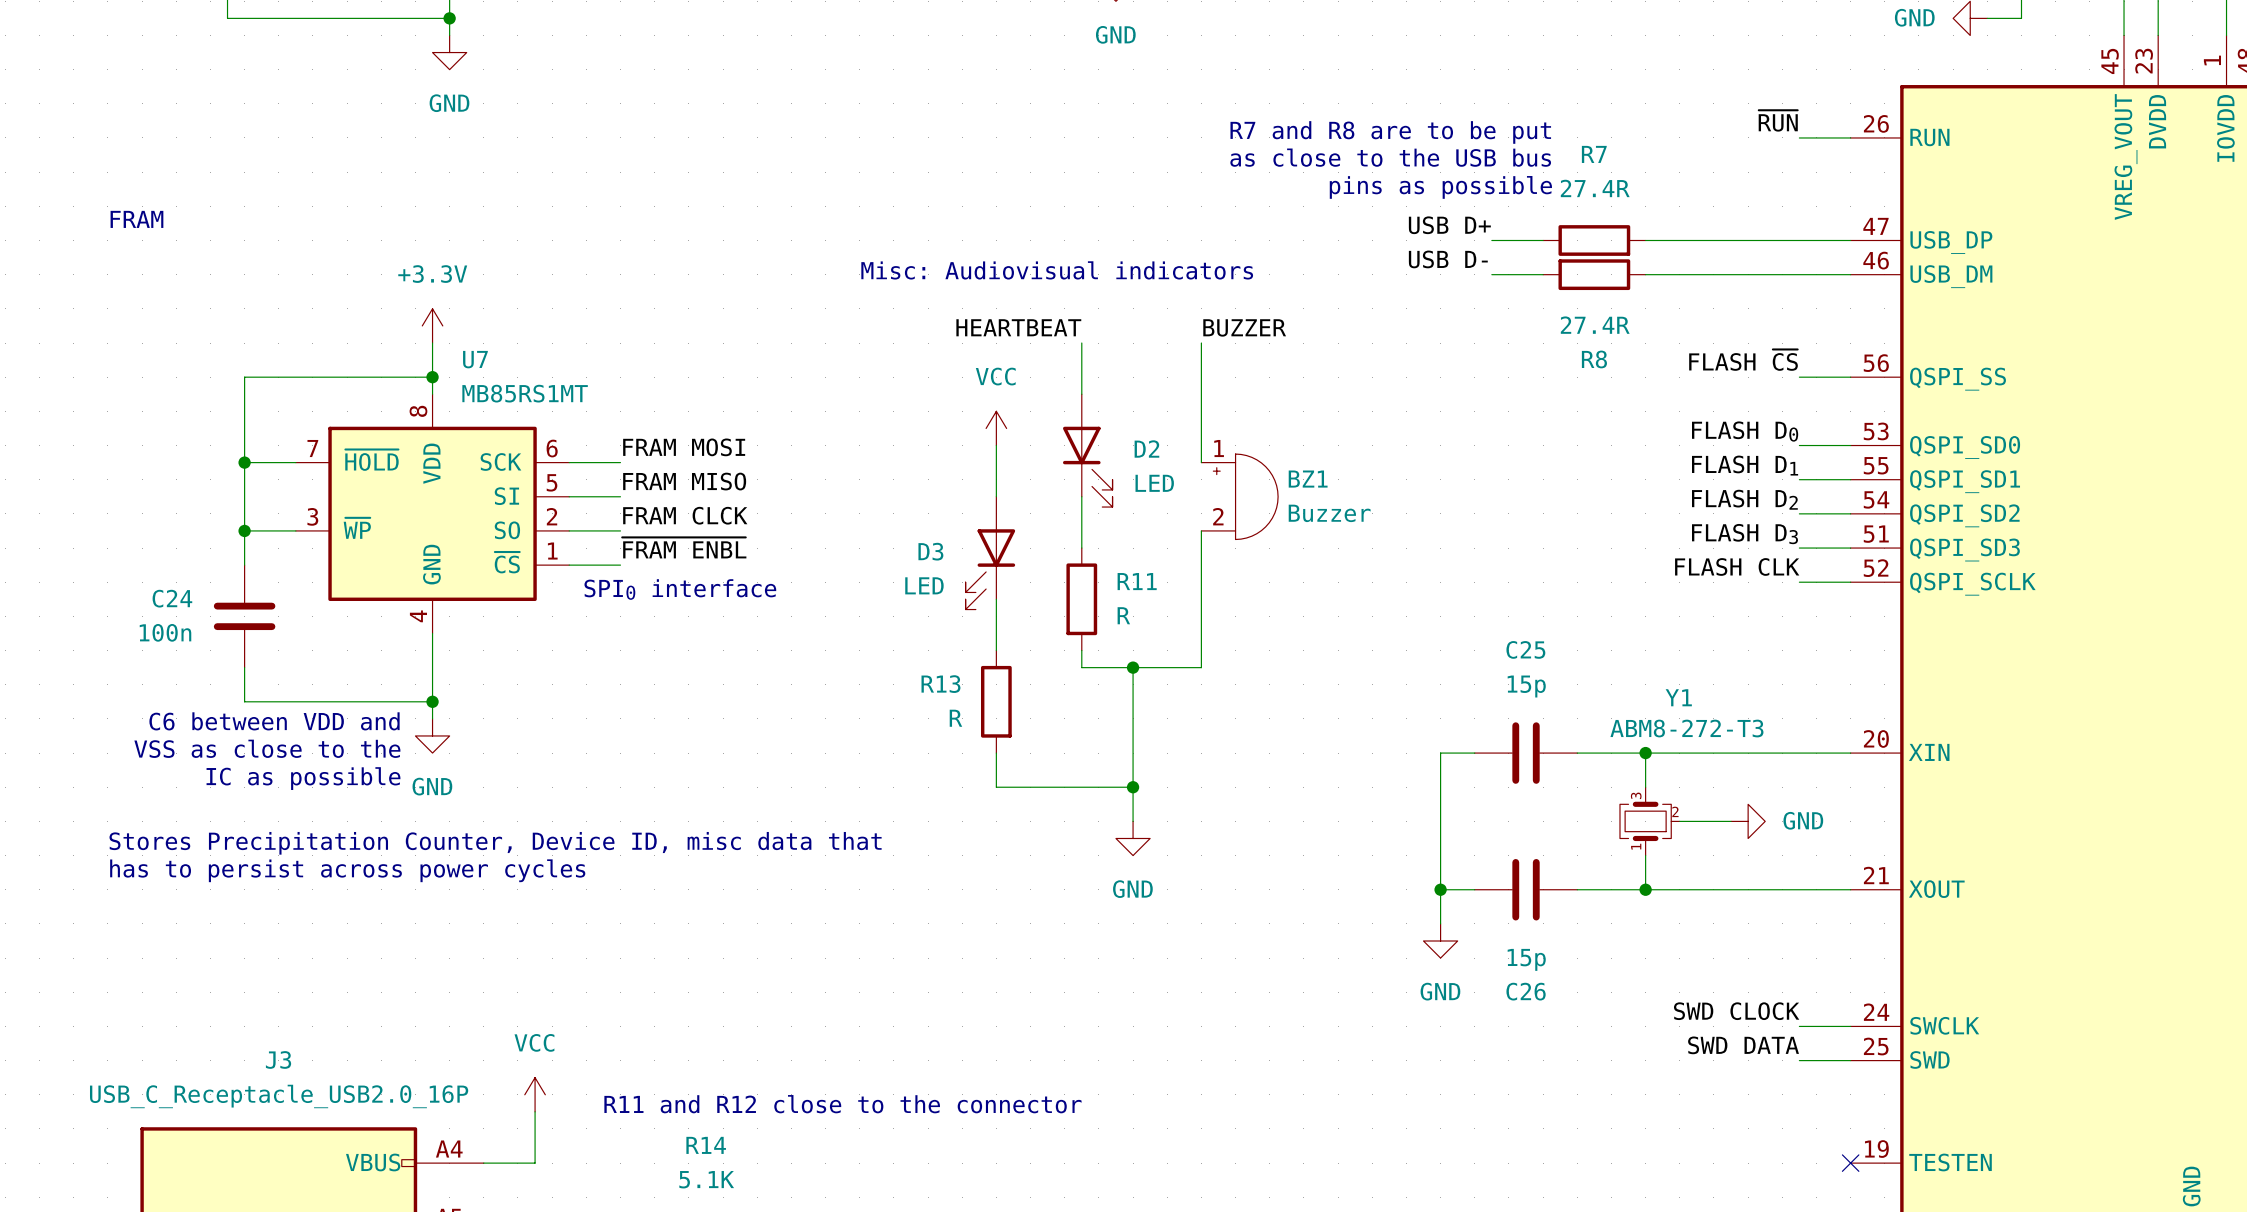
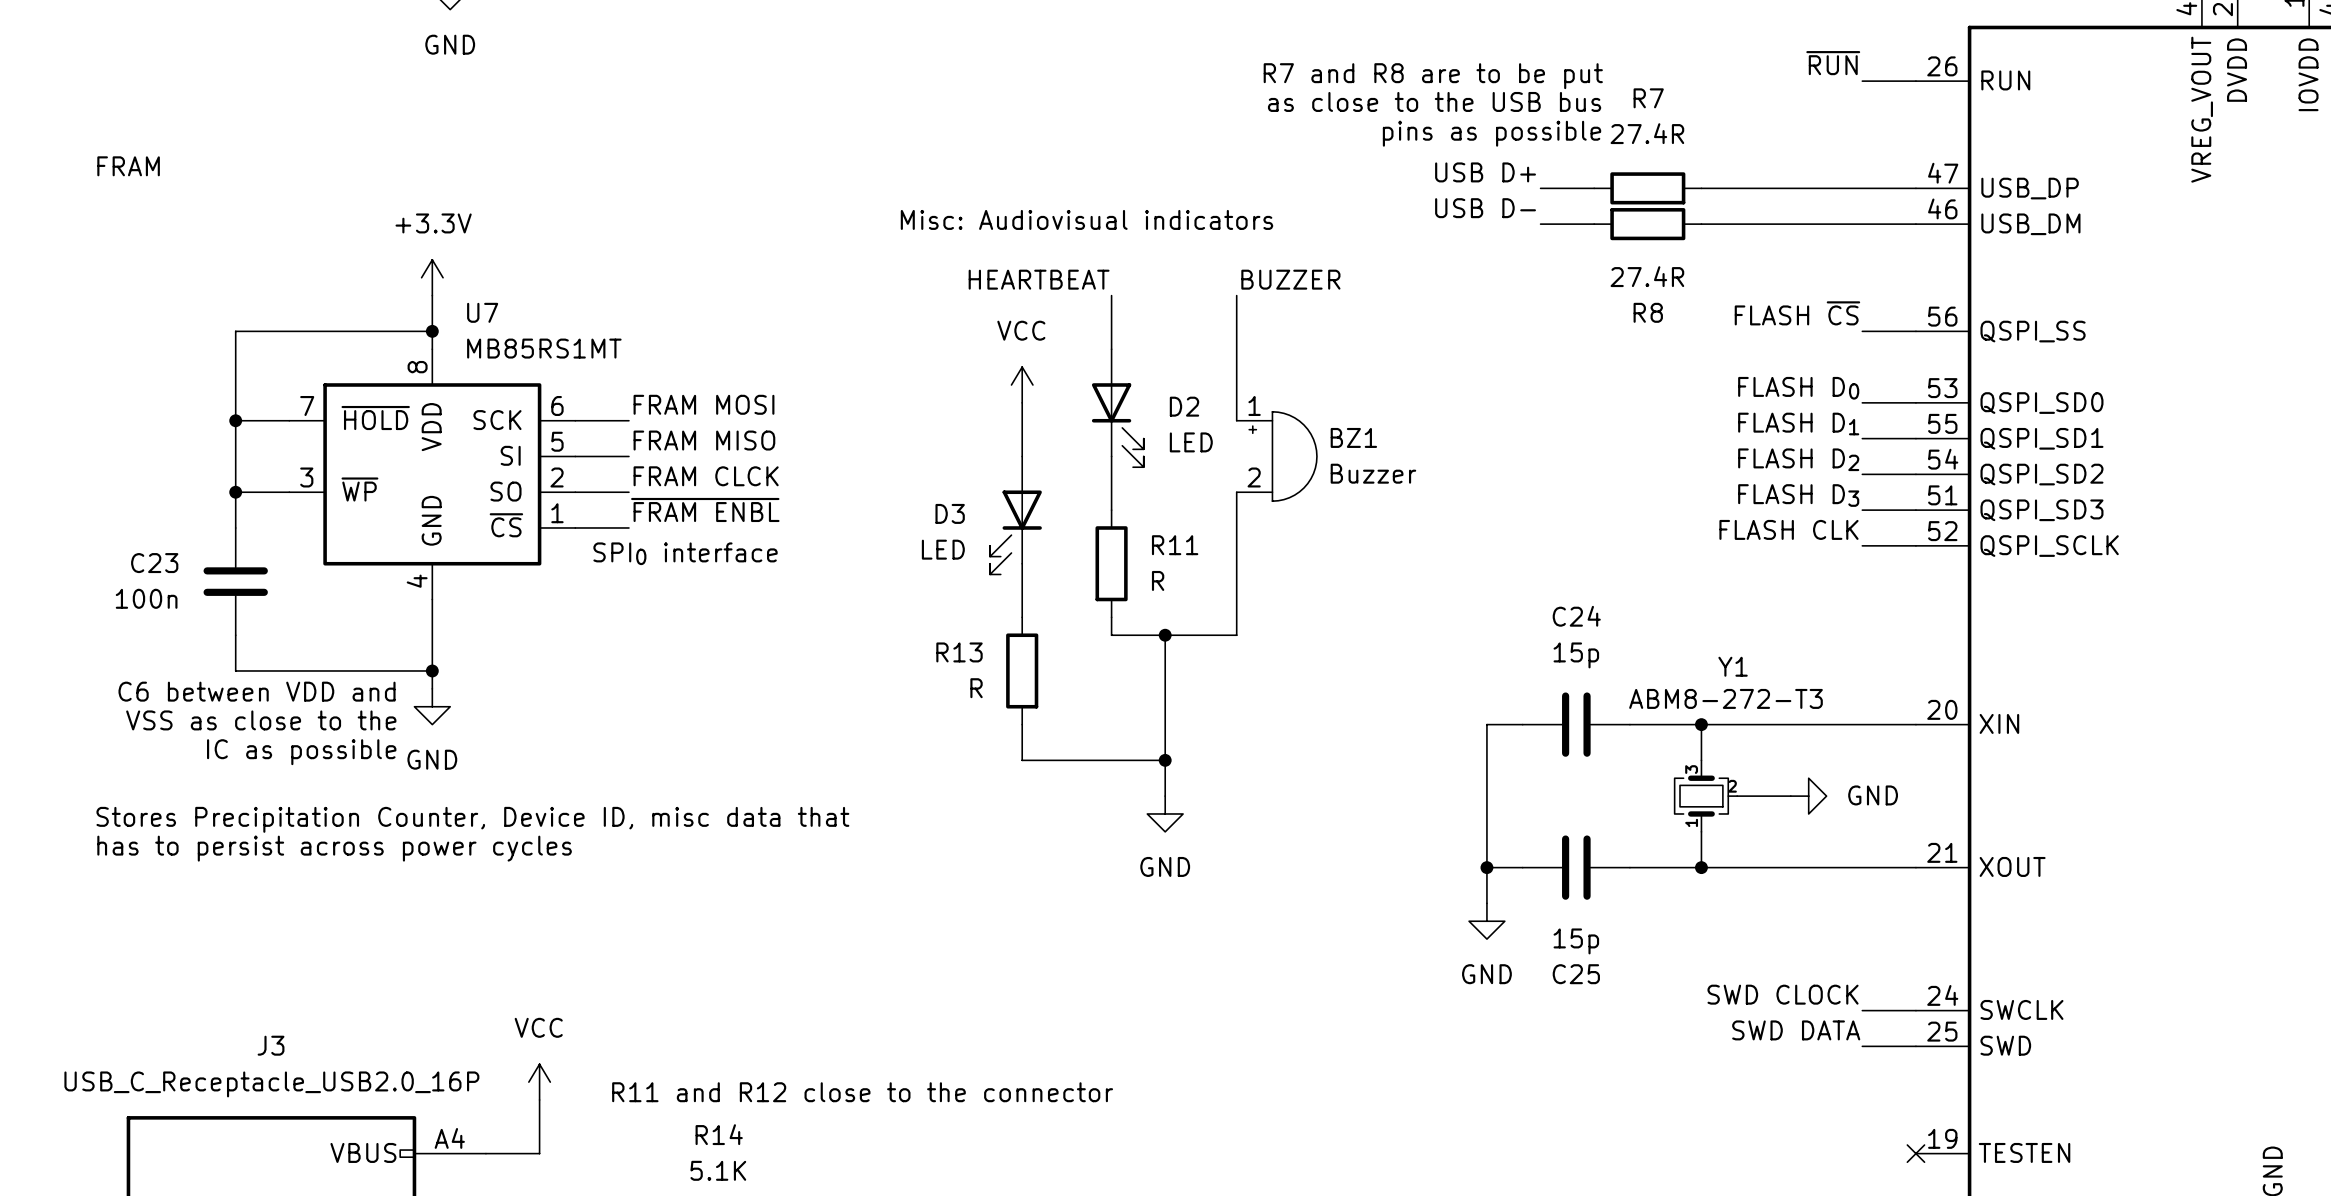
C24 name: C24 (172, 598) -> C23 (154, 563)
C25 name: C25 (1525, 649) -> C24 (1576, 616)
C26 name: C26 (1526, 991) -> C25 (1576, 974)

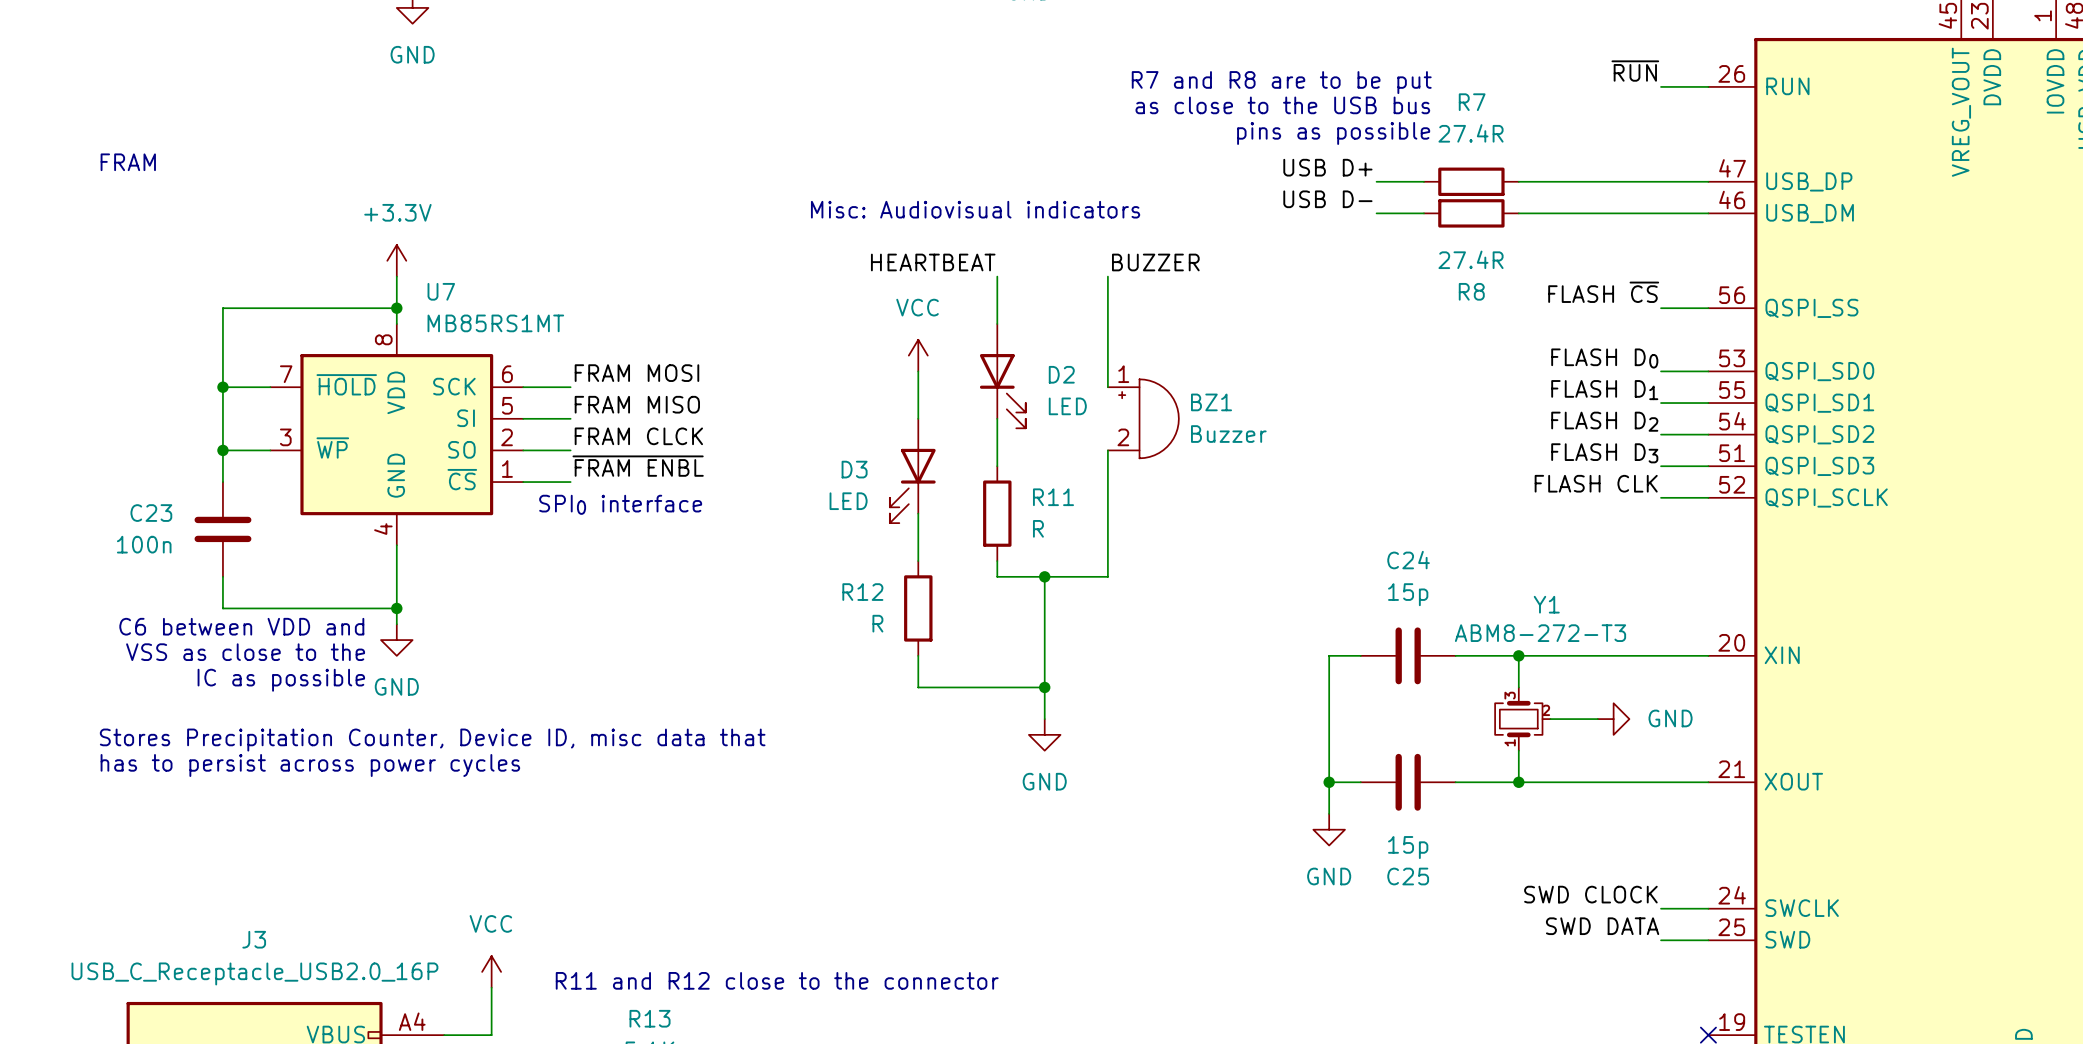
R13 name: R13 (959, 652) -> R12 (862, 592)
R14 name: R14 (719, 1134) -> R13 (650, 1018)

